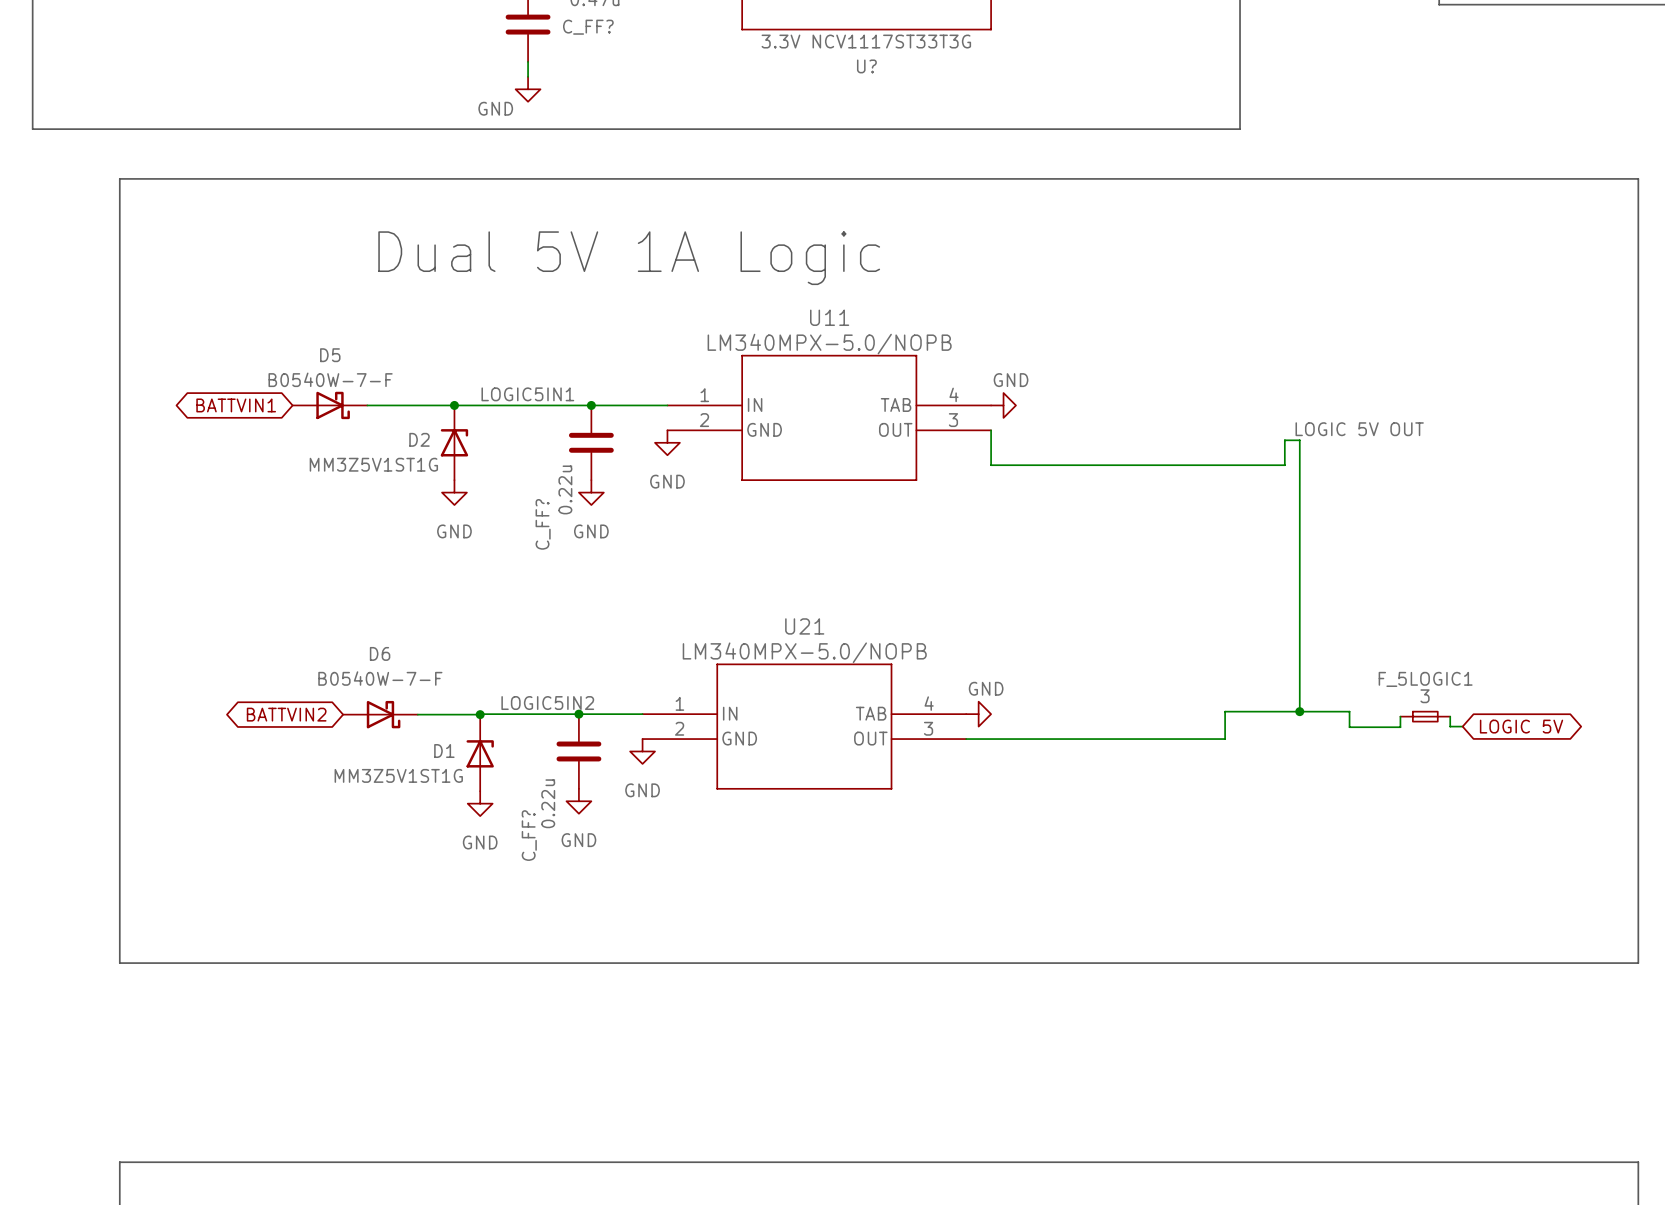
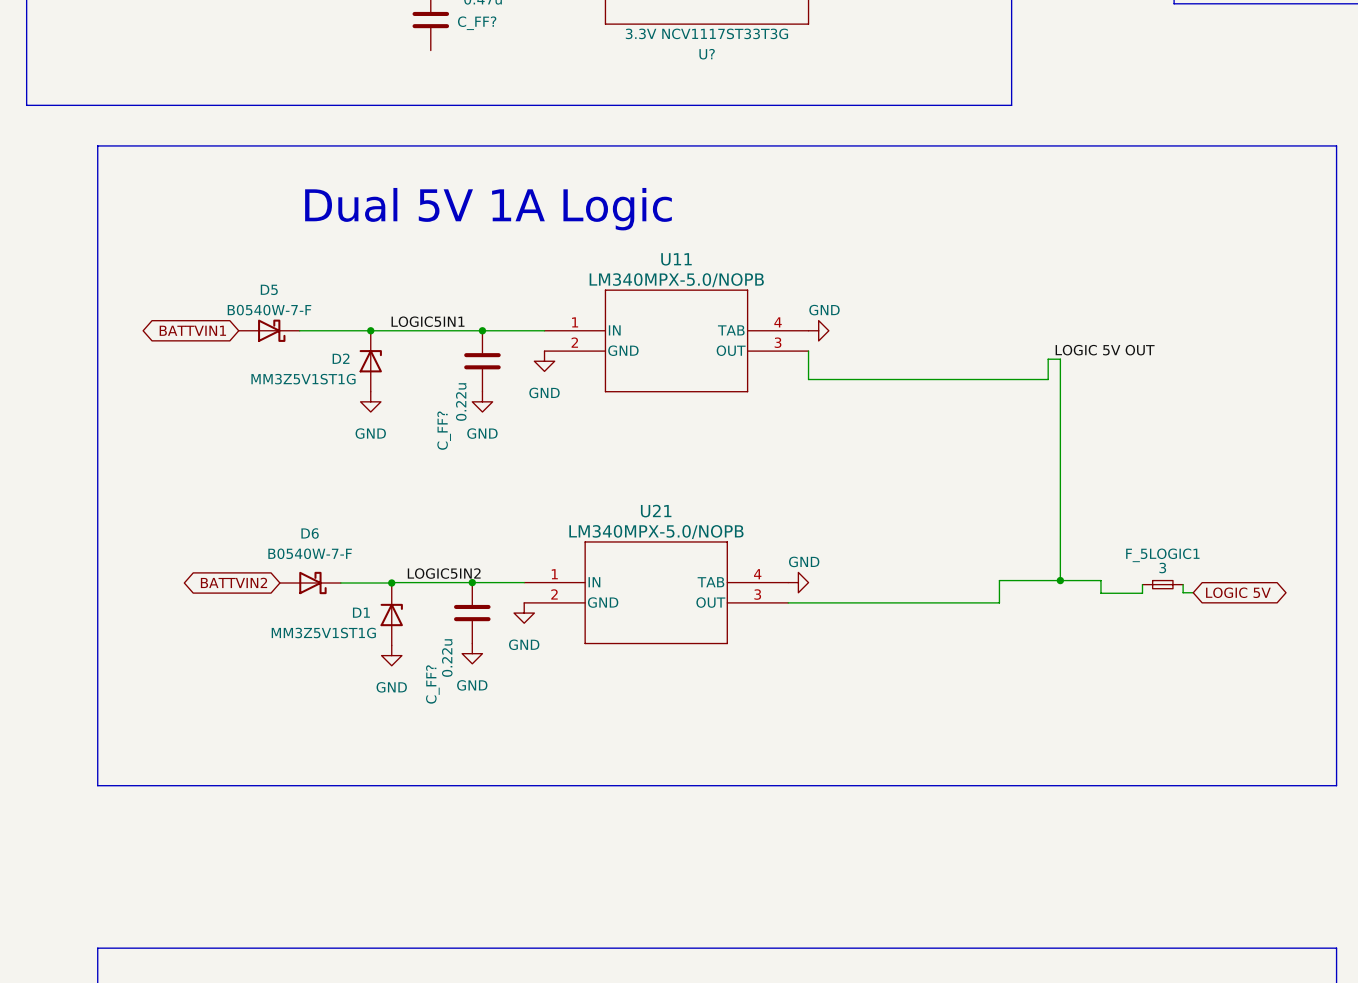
wire: (528, 61) (528, 76) -> none
power symbol: GND (528, 89) -> none

